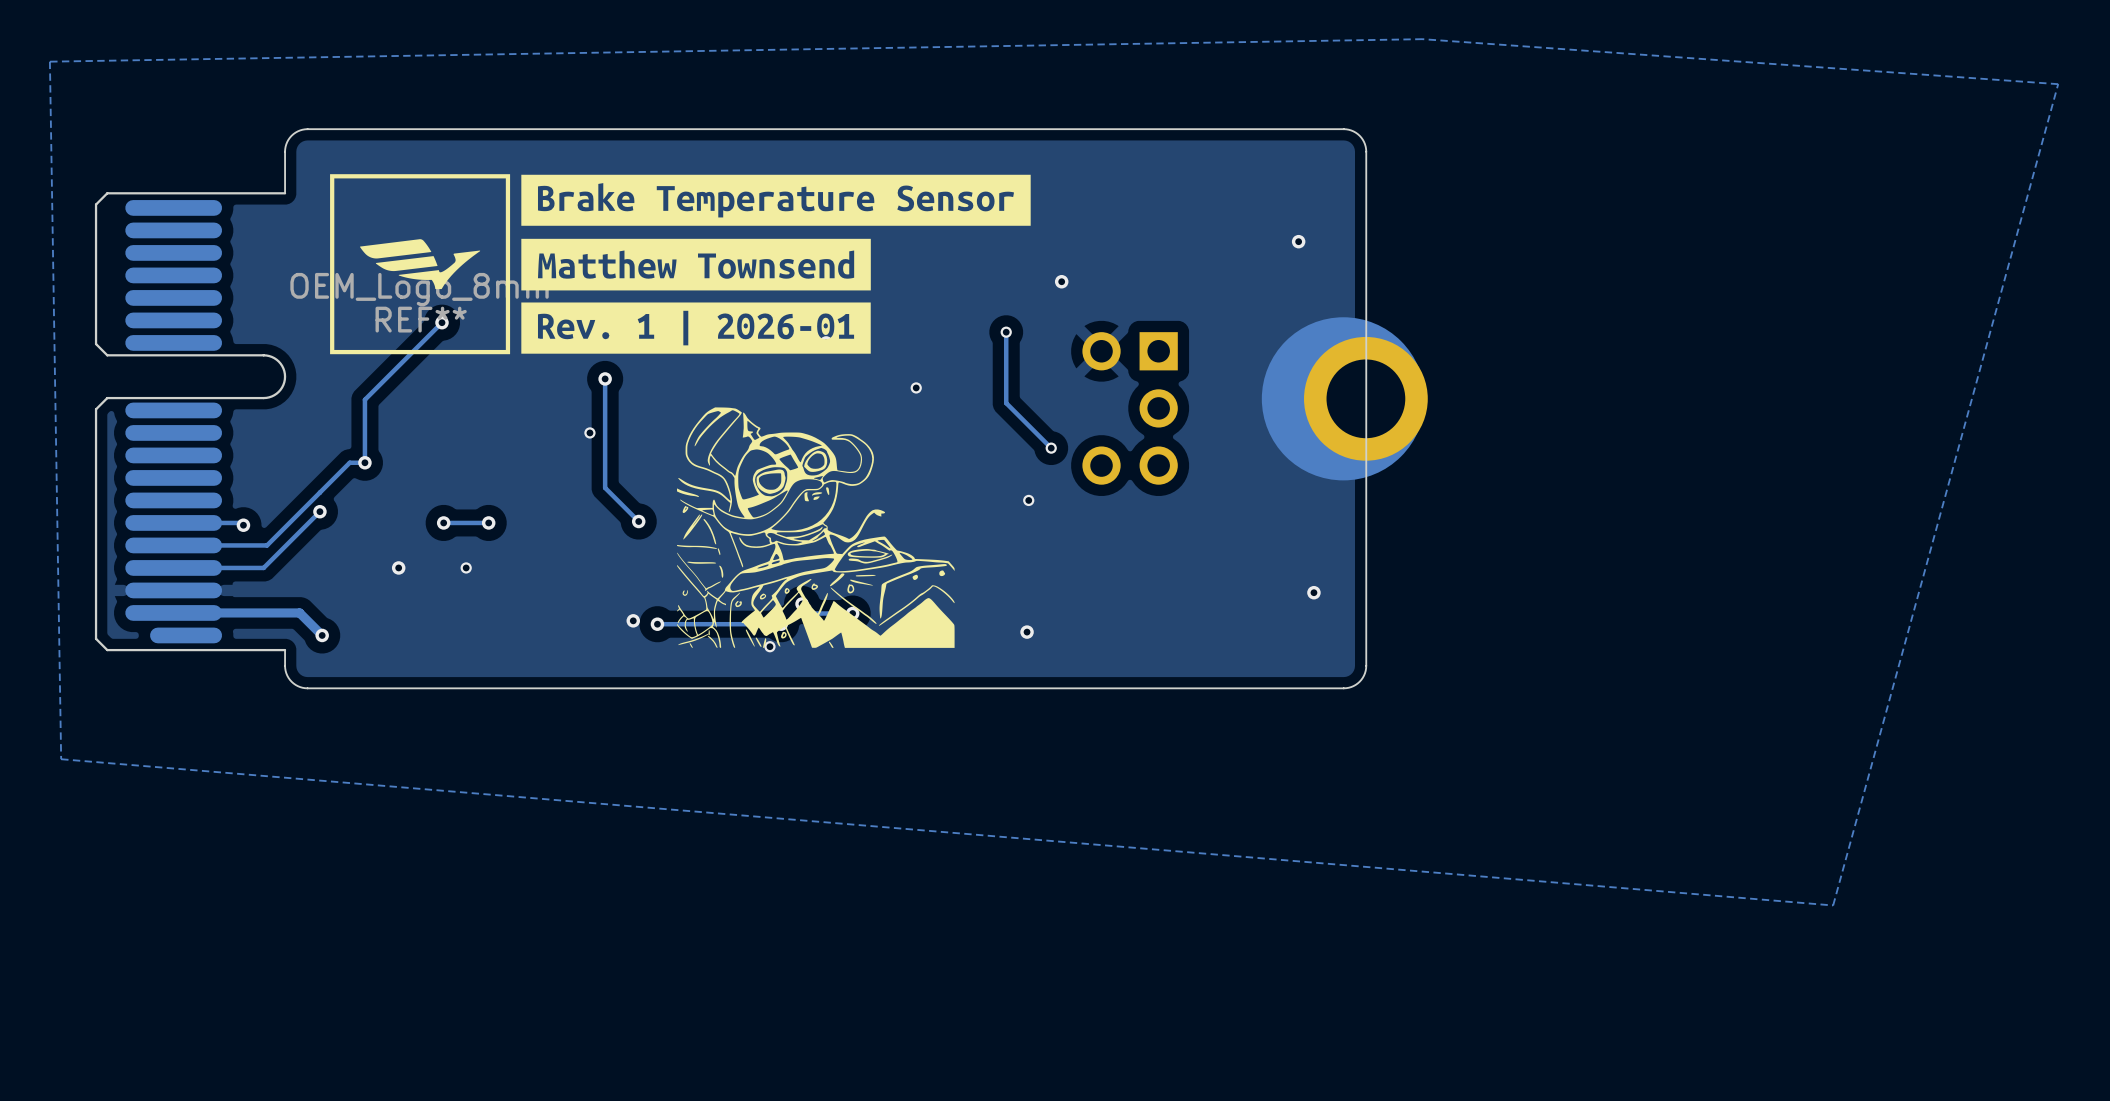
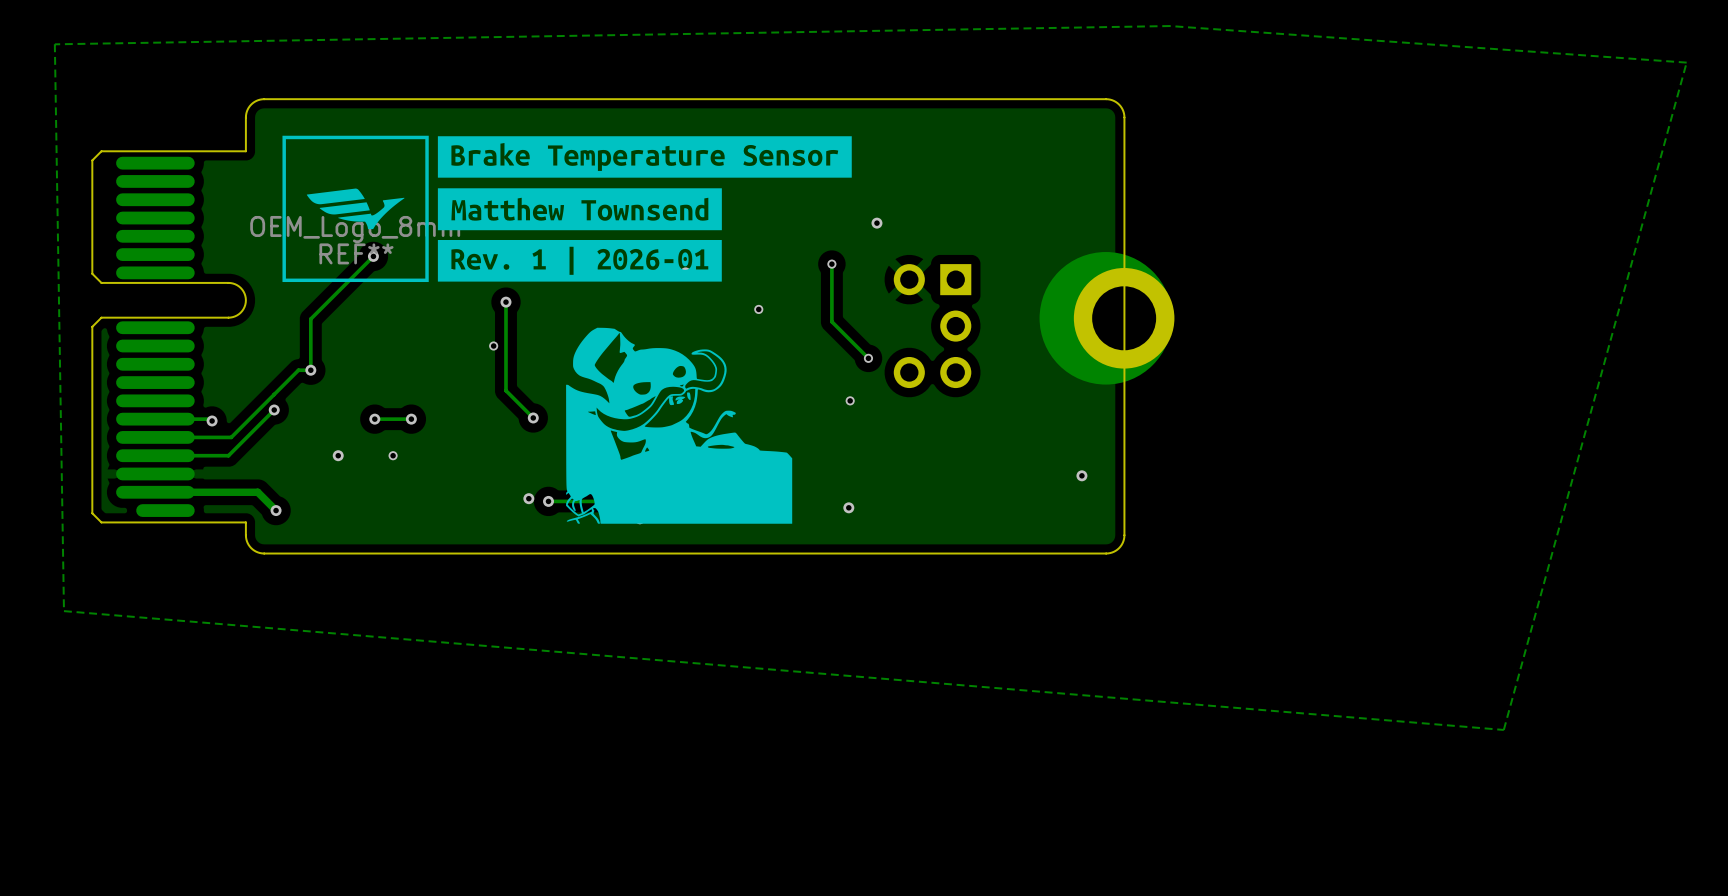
via: (1298, 241) -> none
drawing shape: [677, 407, 955, 648] -> [566, 327, 793, 524]

